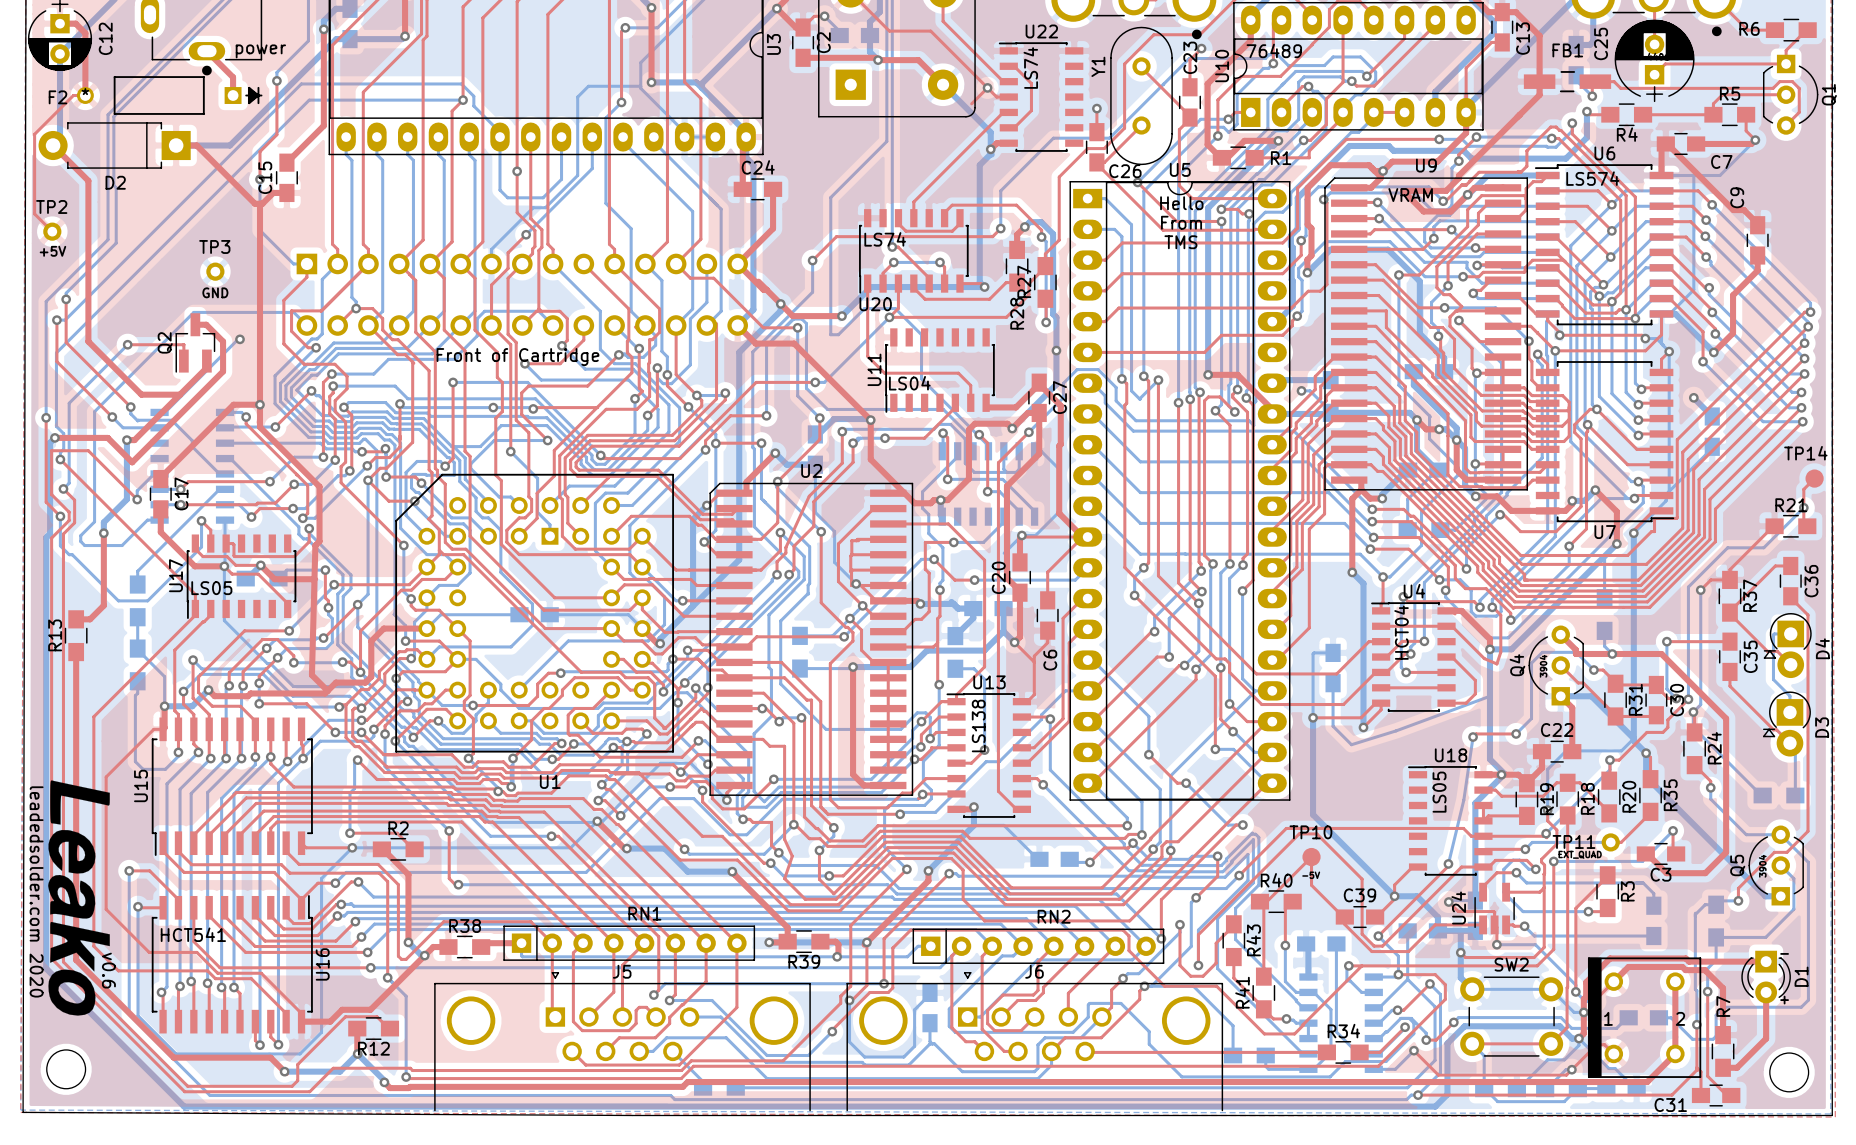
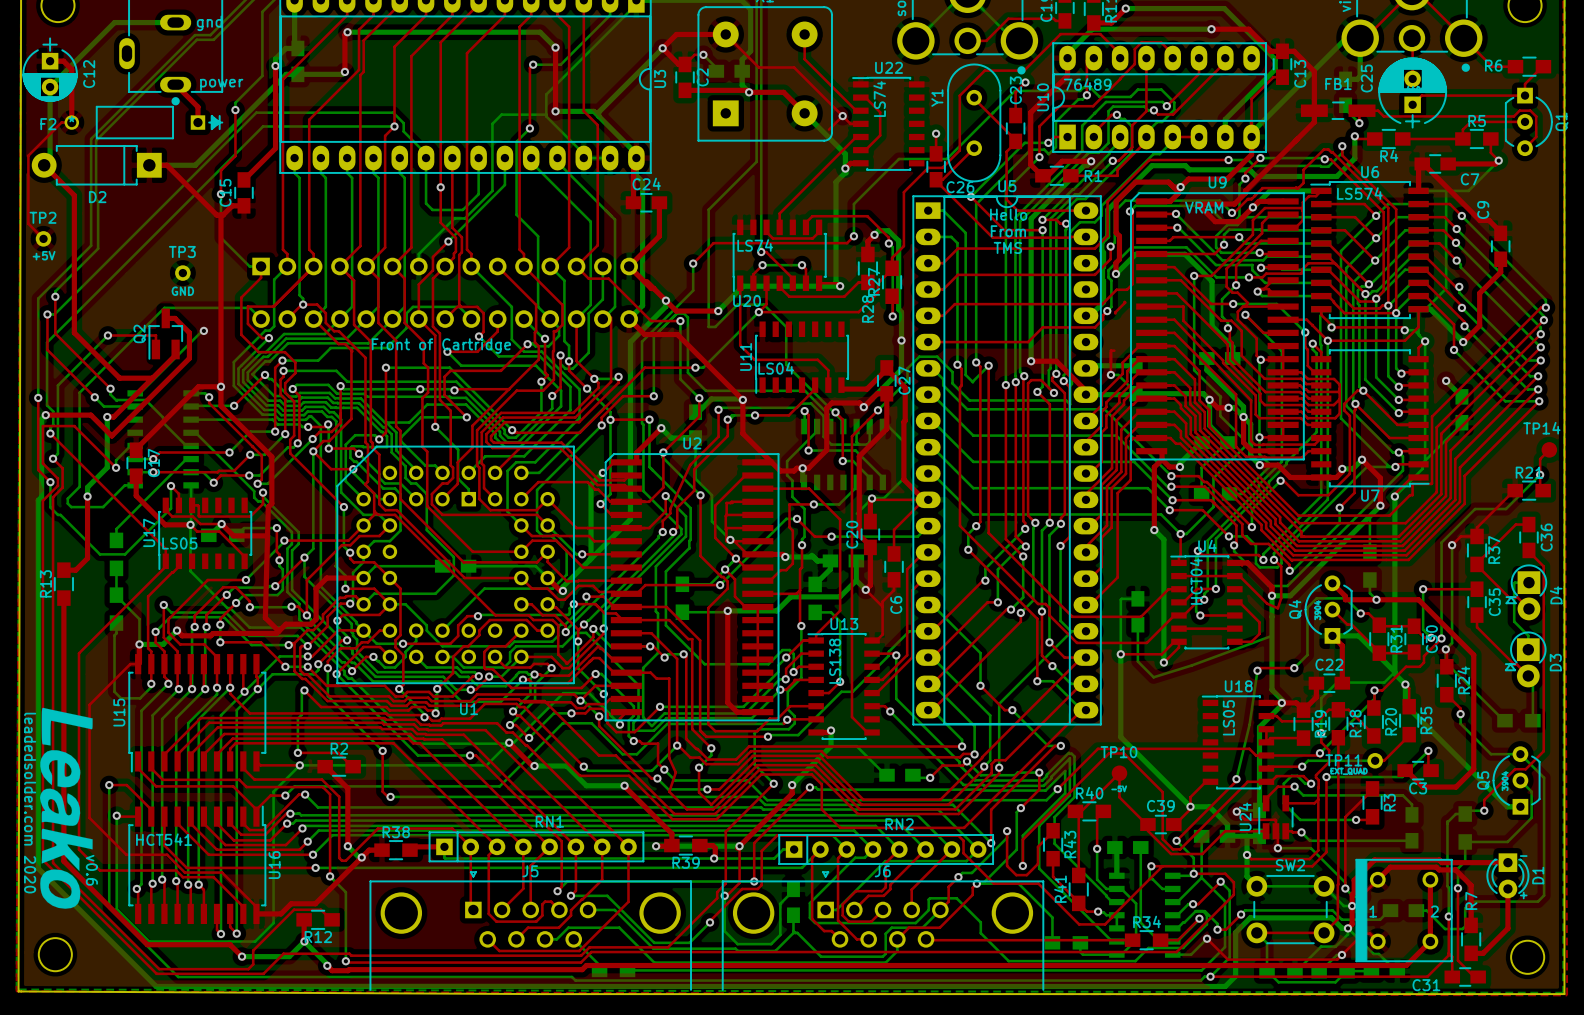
top track: none -> (1263, 289) (1268, 289) (1272, 293)
top track: (1503, 295) (1517, 295) (1536, 313) (1547, 313) -> none
top track: none -> (1125, 302) (1115, 313)
top track: none -> (1114, 350) (1110, 350) (1110, 374)

